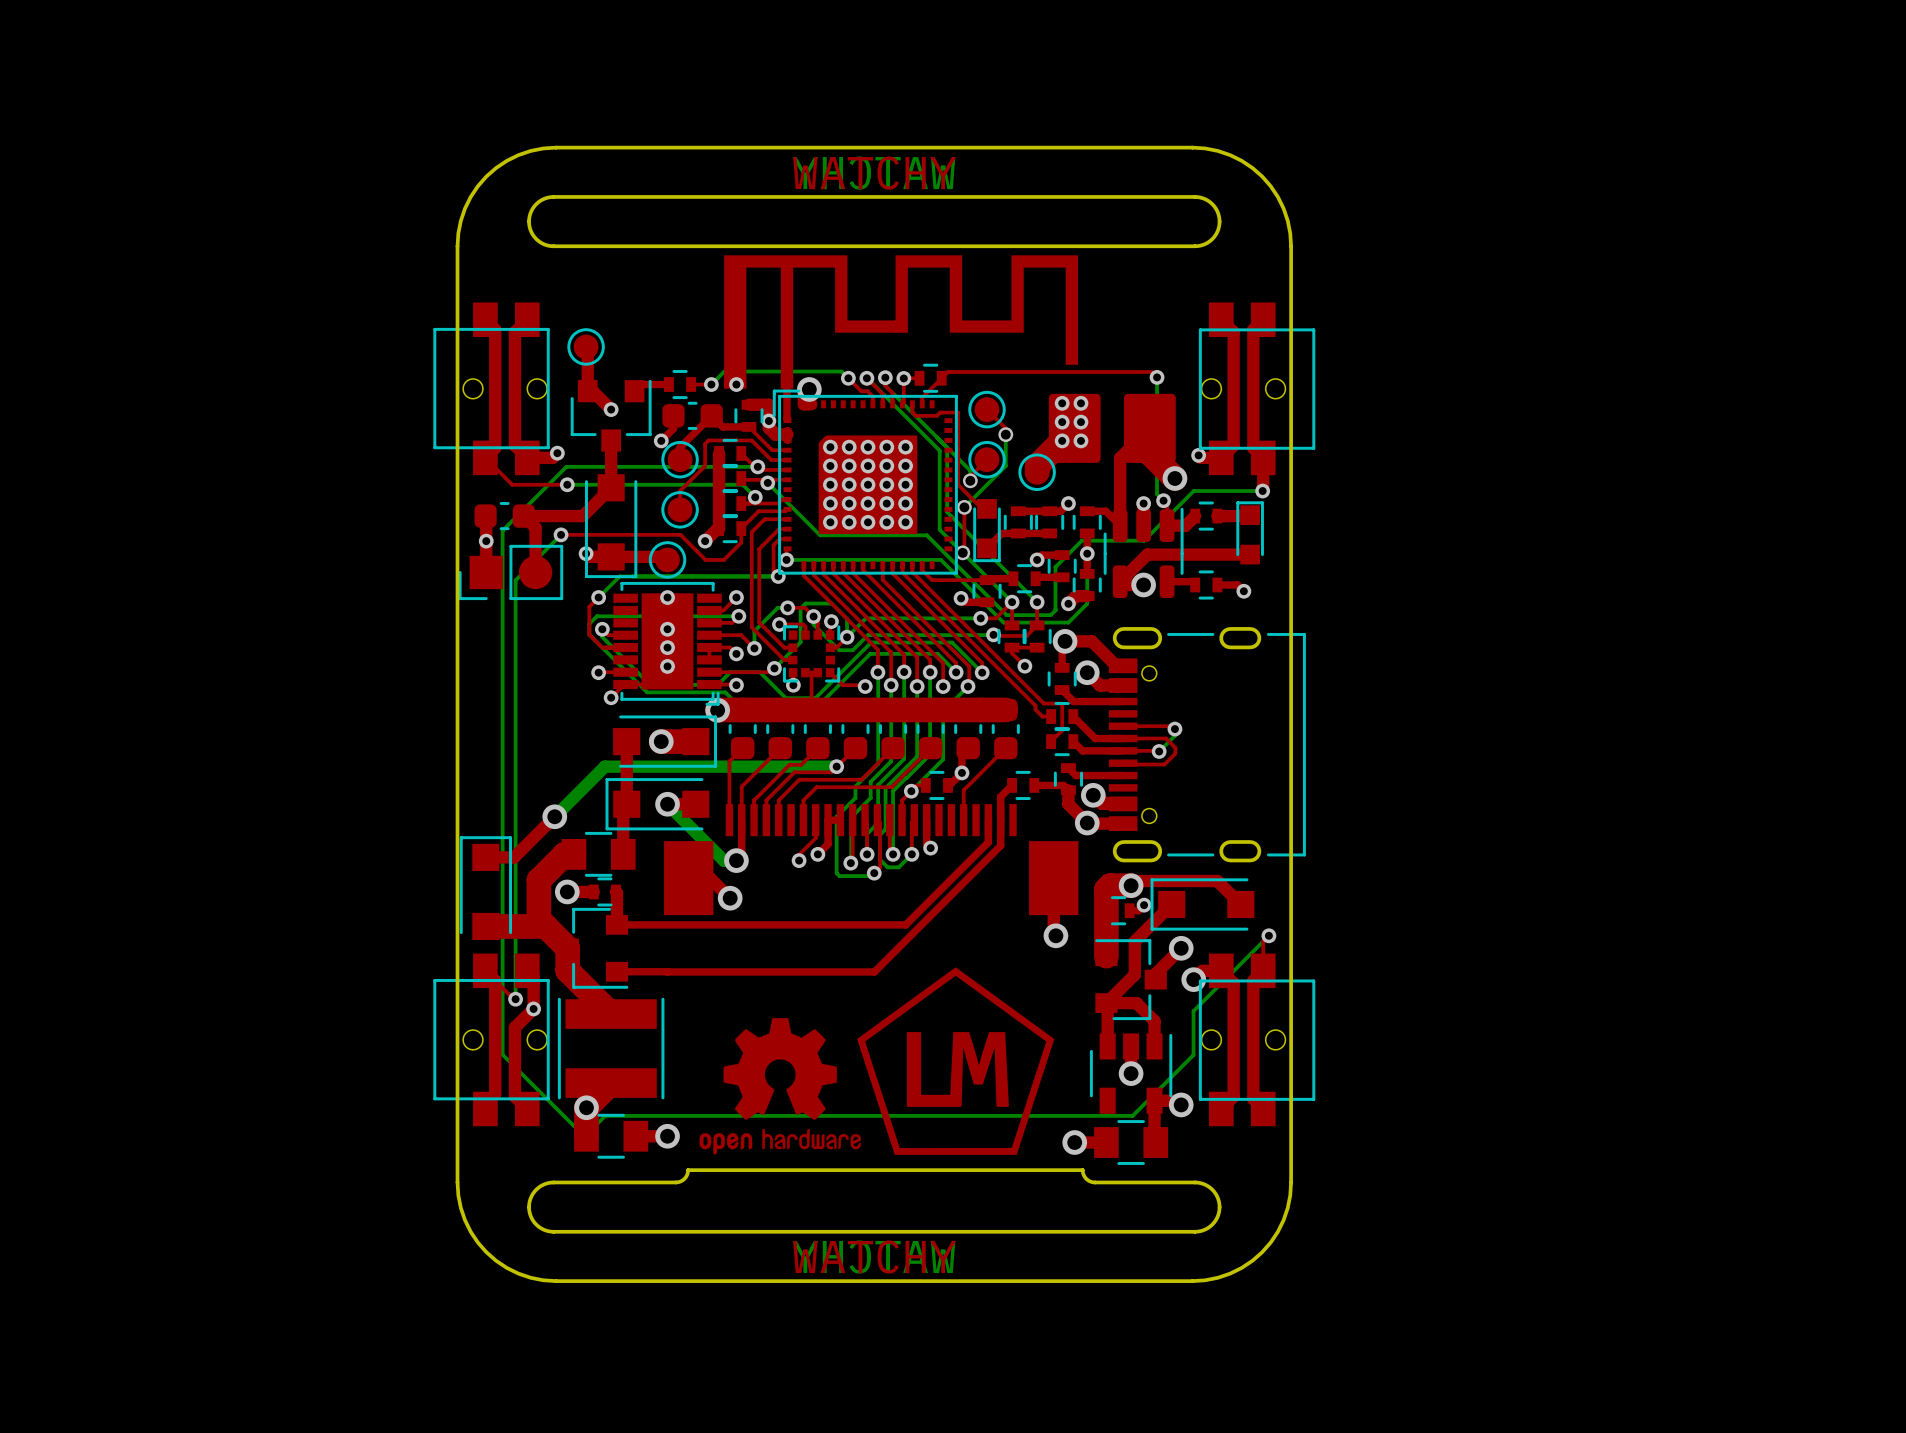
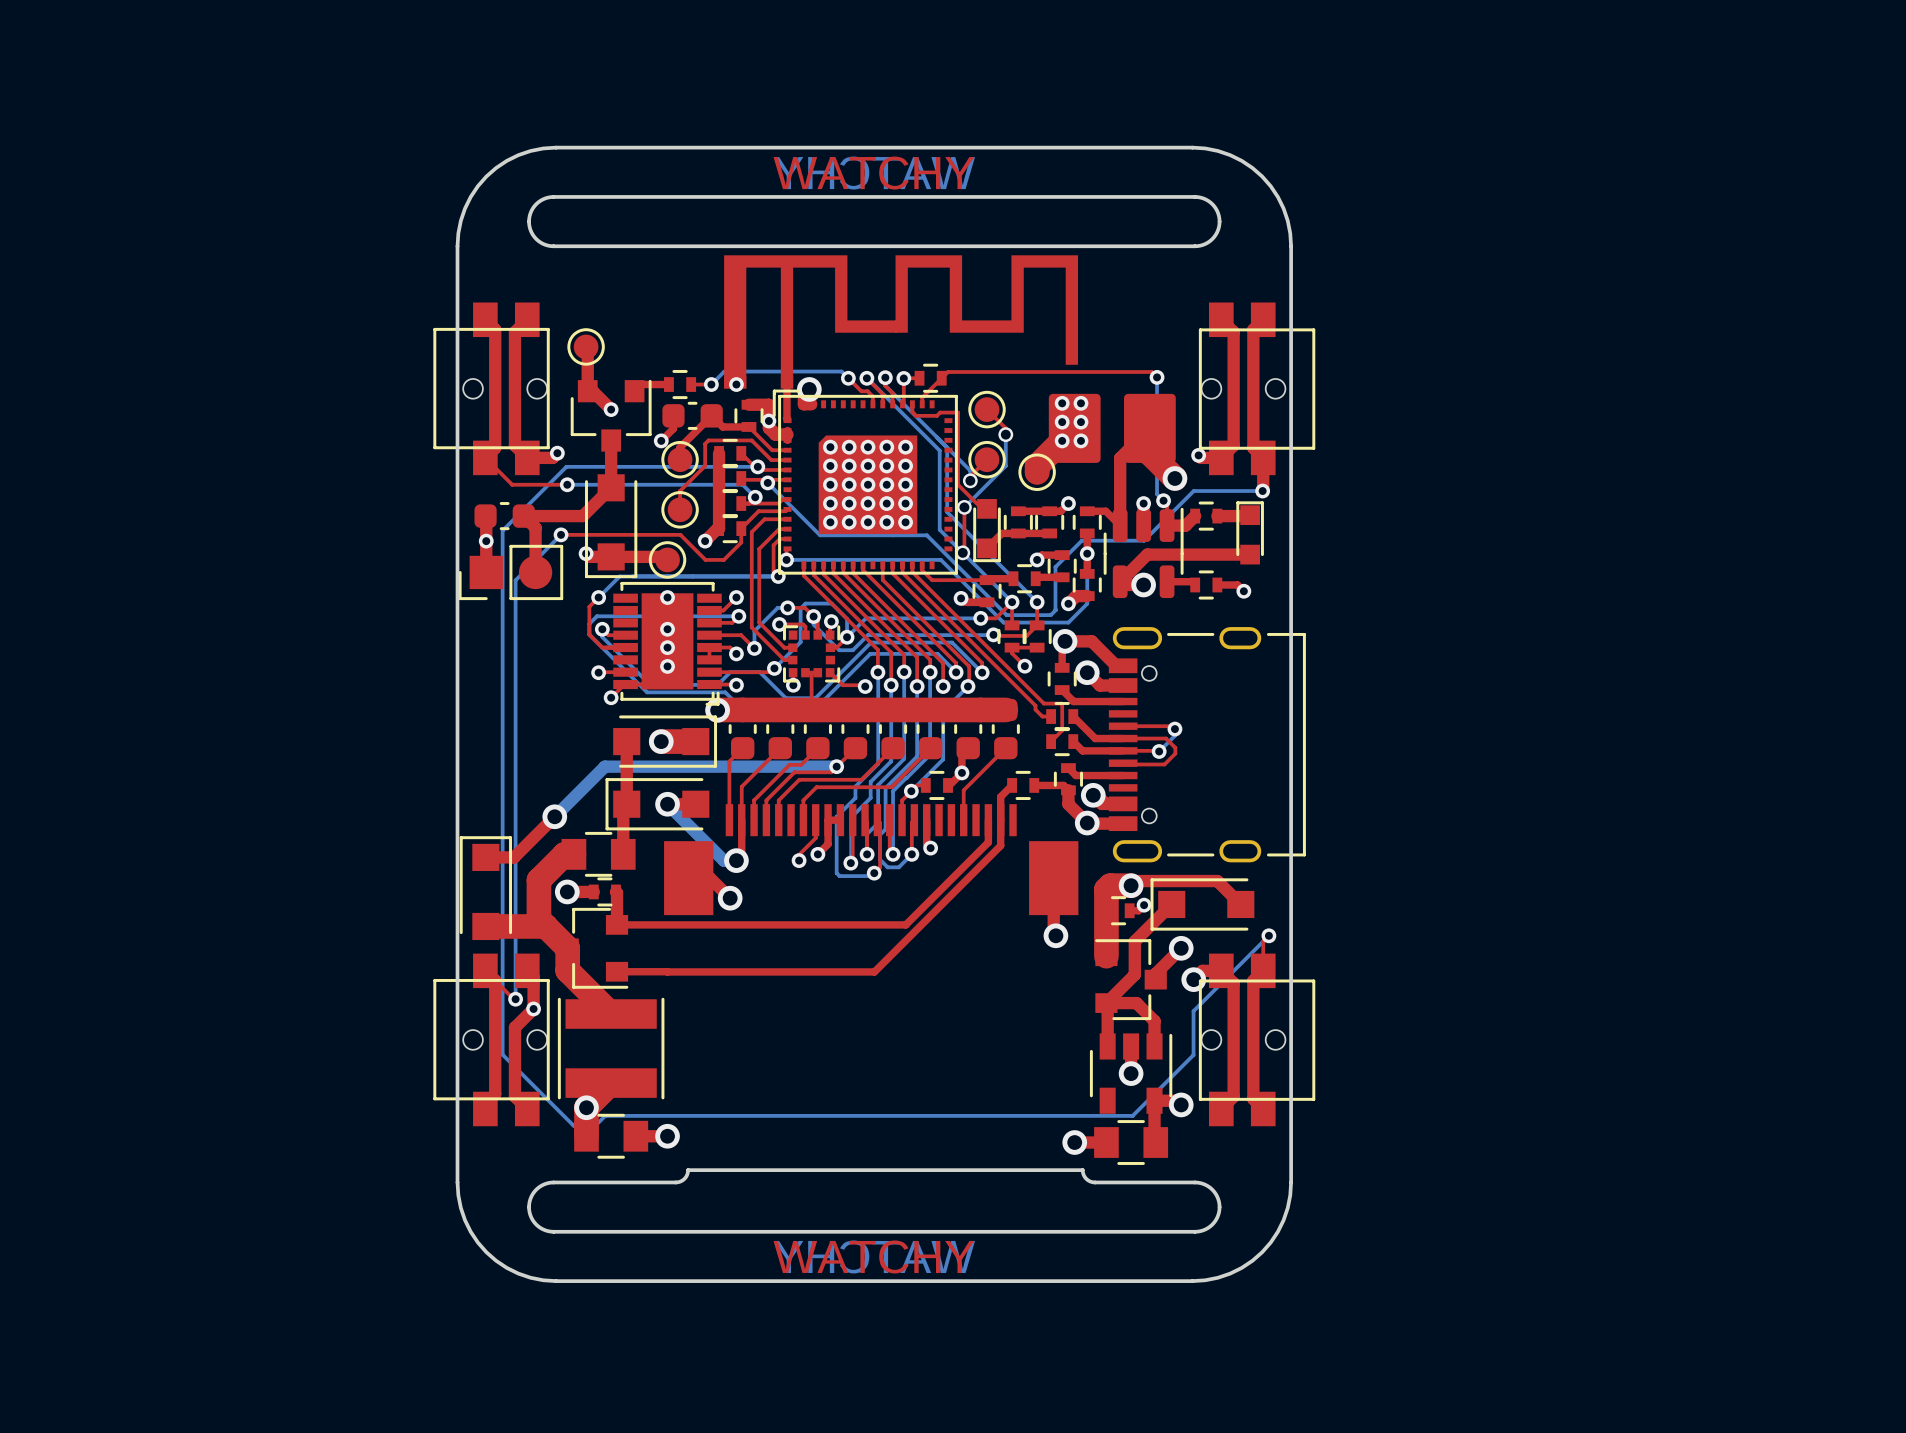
drawing: [699, 967, 1055, 1155] -> none

